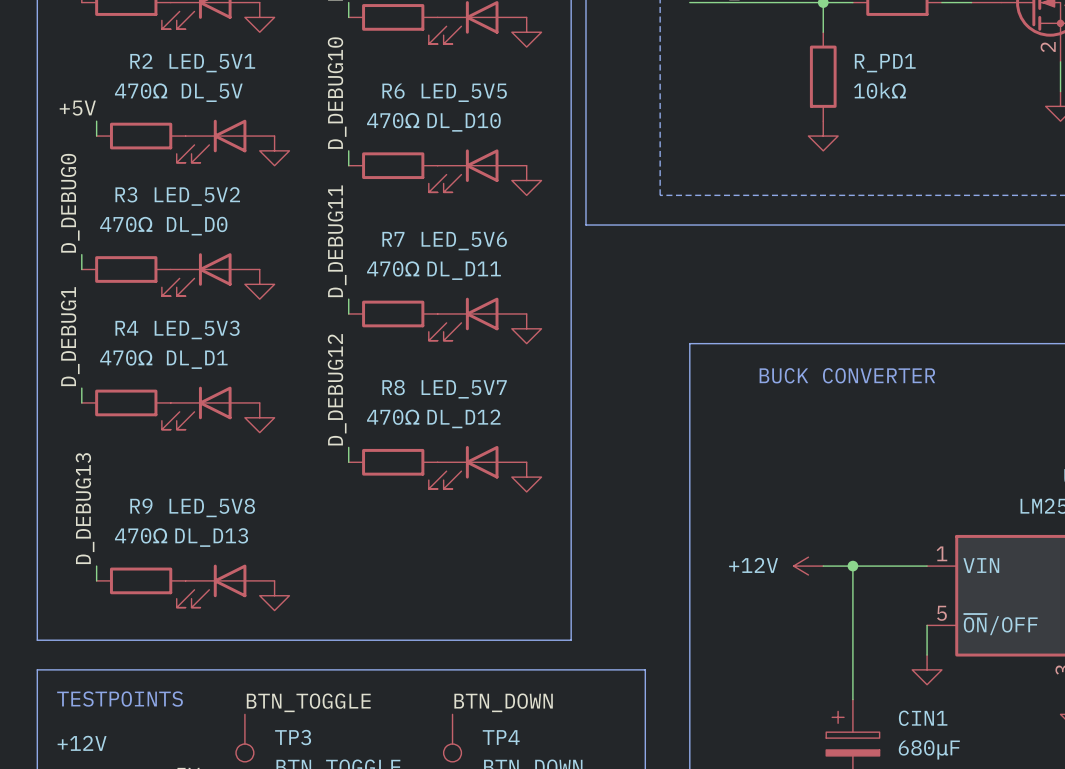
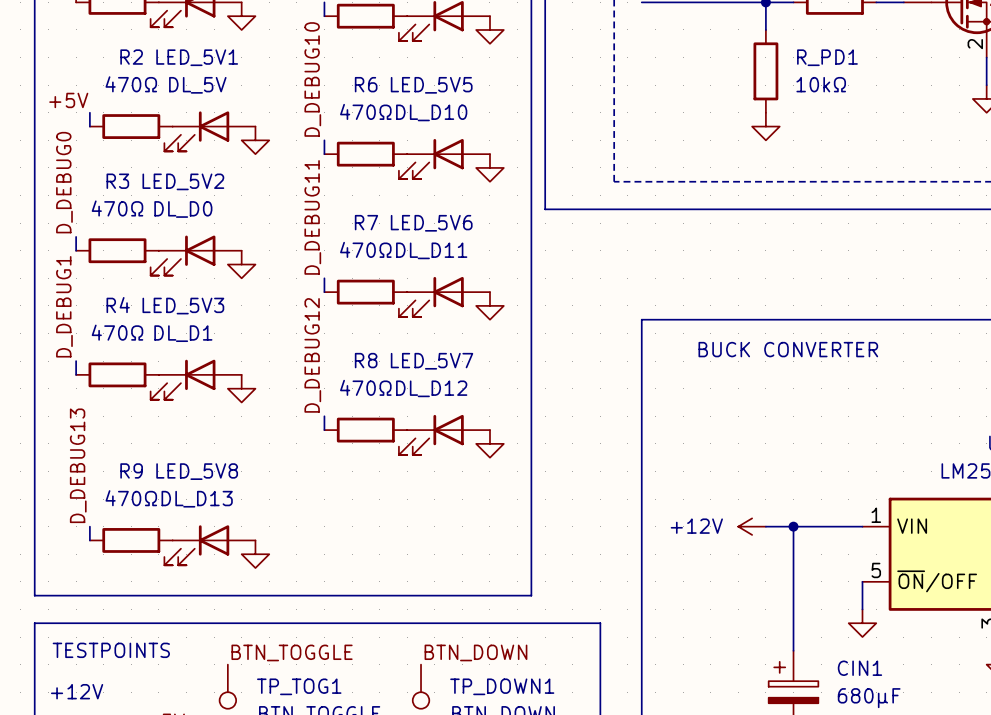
TP3 name: TP3 (293, 737) -> TP_TOG1 (299, 686)
TP4 name: TP4 (501, 737) -> TP_DOWN1 (502, 686)

